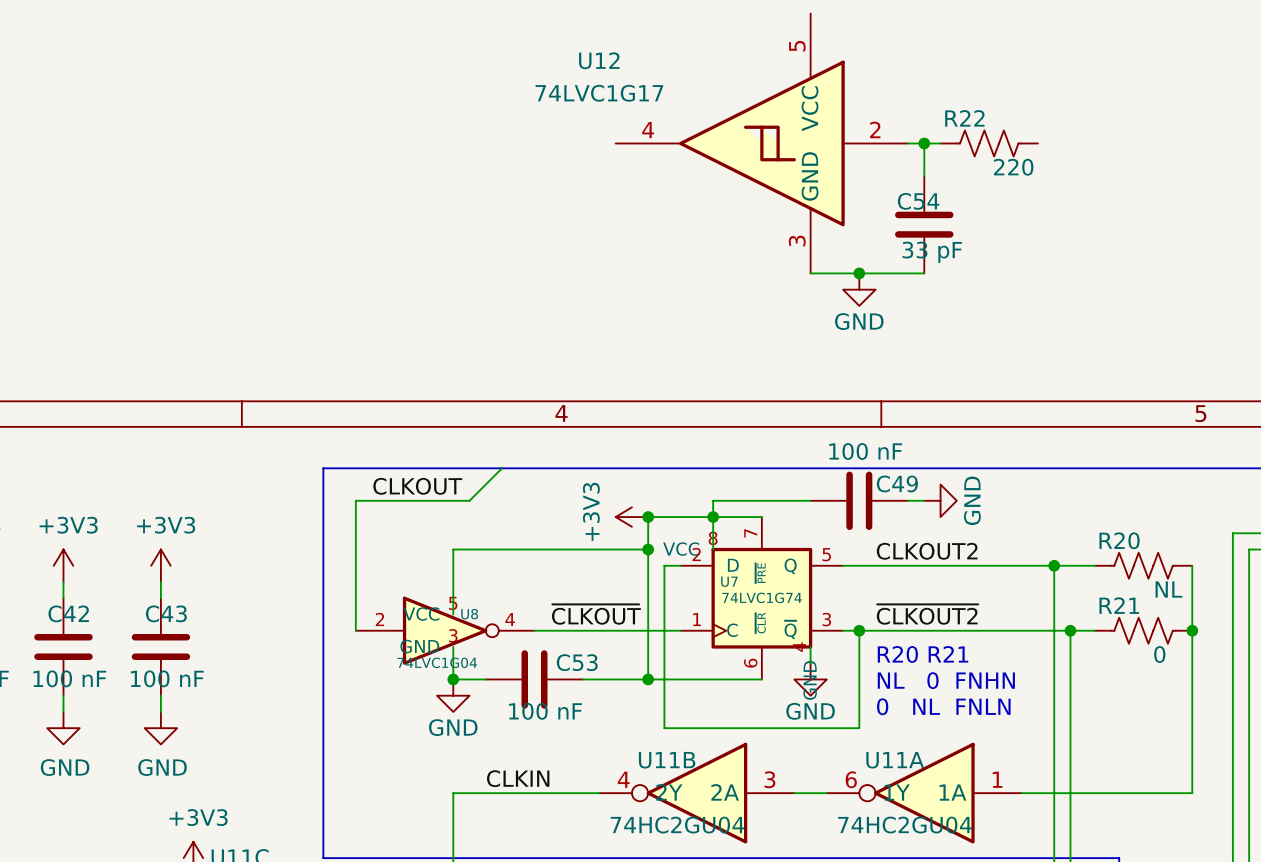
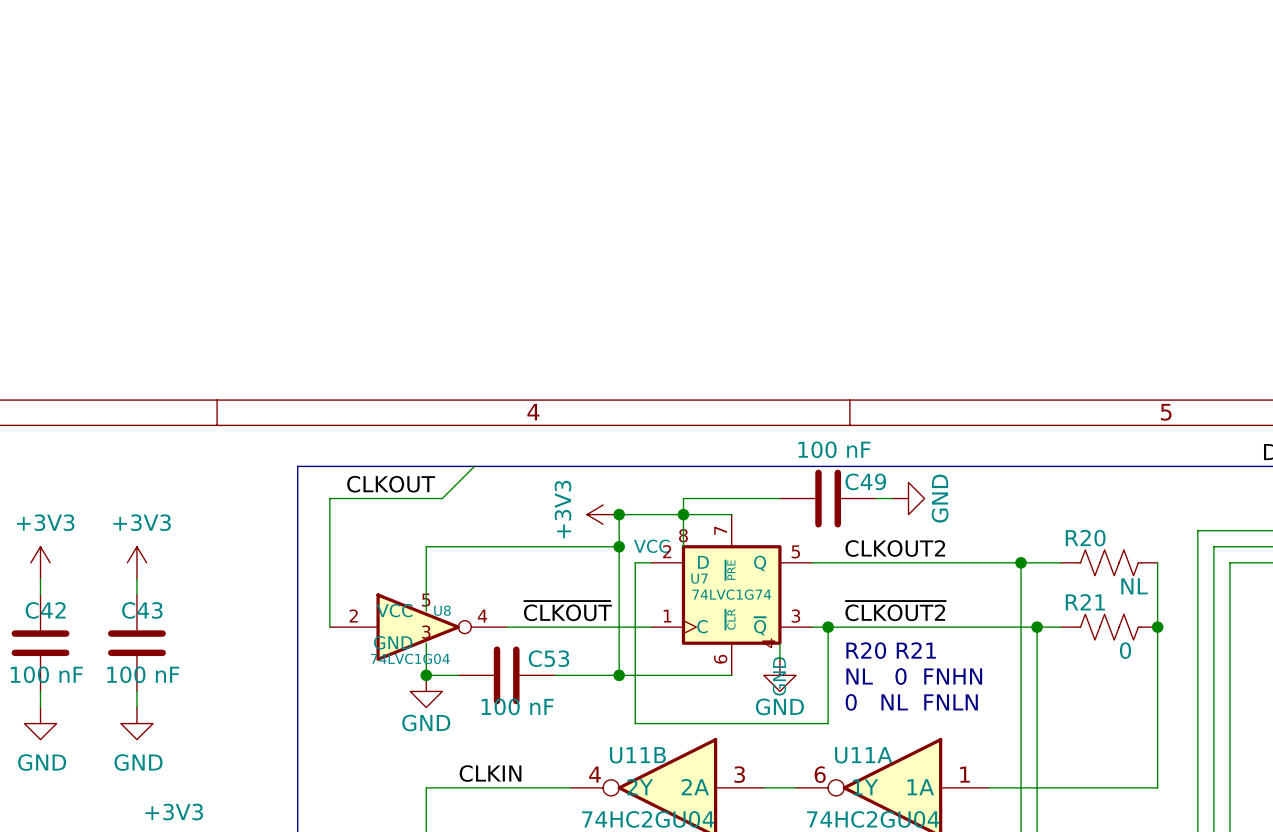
U12: 74LVC1G17 (761, 143) -> none
wire: (908, 143) (940, 143) -> none
wire: (924, 143) (924, 175) -> none
junction: (924, 143) -> none
R22: 220 (989, 143) -> none
C54: 33 pF (924, 224) -> none
wire: (810, 273) (924, 273) -> none
junction: (859, 273) -> none
power symbol: GND (859, 289) -> none

